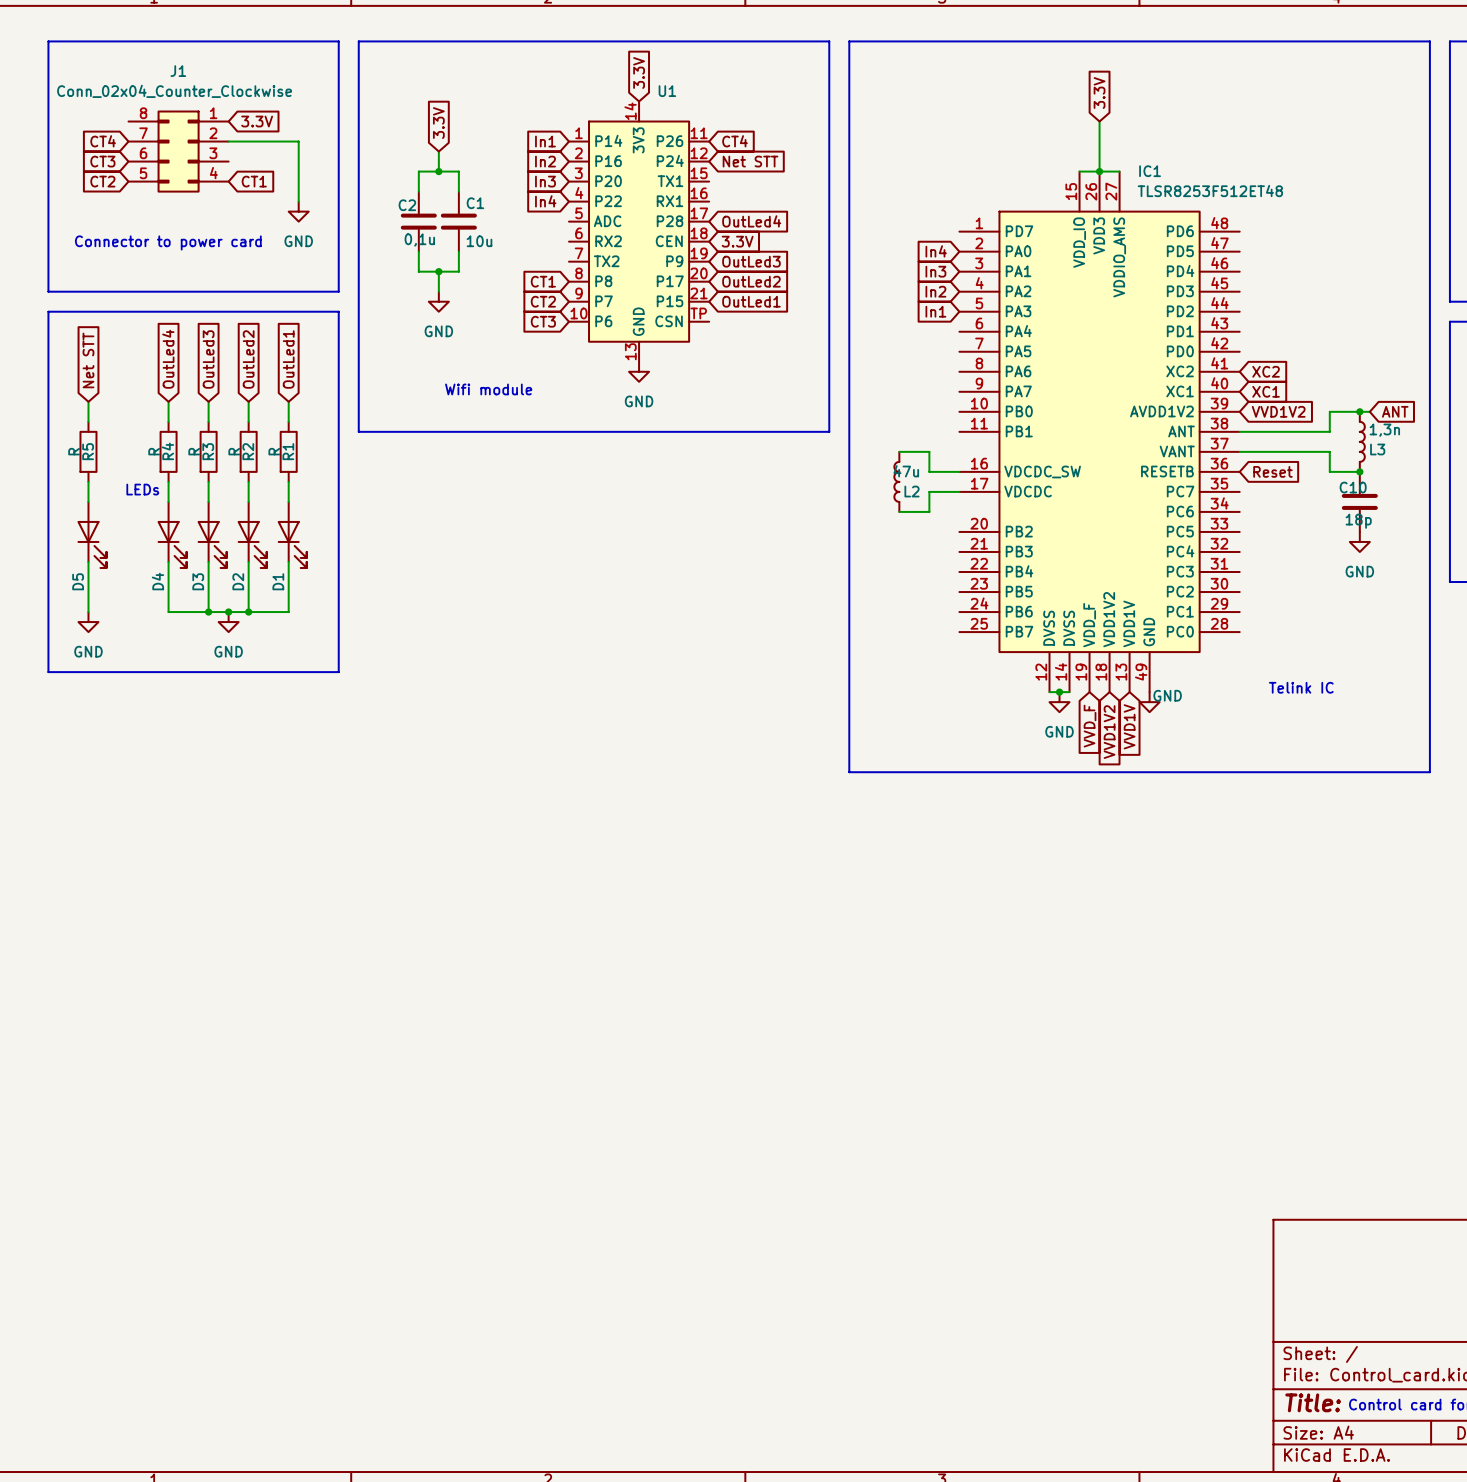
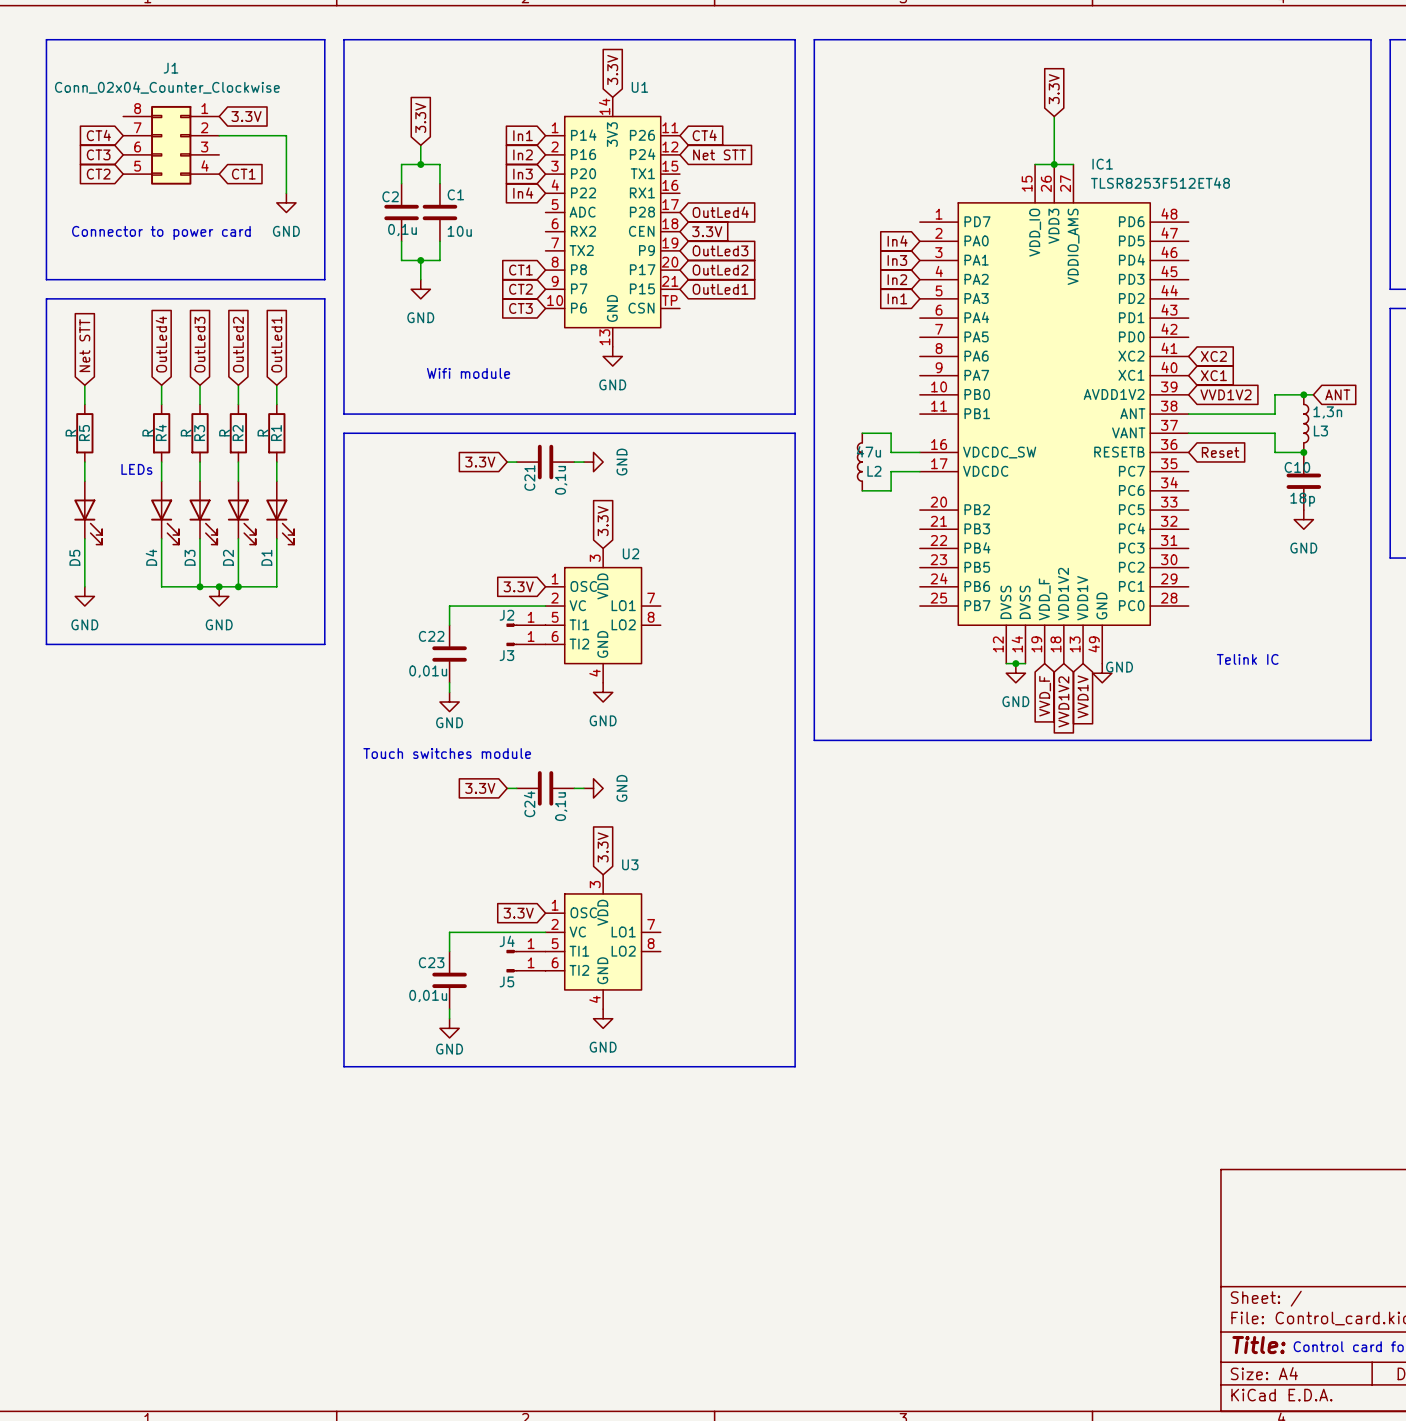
line: none -> (343, 433) (795, 433) (795, 1066) (343, 1066) (343, 433)
global label: none -> 3.3V (480, 462)
wire: none -> (507, 462) (516, 462)
C21: none -> 0,1u (545, 462)
wire: none -> (574, 462) (583, 462)
power symbol: none -> GND (593, 462)
global label: none -> 3.3V (603, 521)
global label: none -> 3.3V (518, 586)
wire: none -> (545, 606) (449, 606) (449, 625)
U2: none -> (603, 615)
J2: none -> (526, 625)
J3: none -> (526, 644)
C22: none -> 0,01u (449, 654)
wire: none -> (449, 682) (449, 692)
power symbol: none -> GND (603, 692)
power symbol: none -> GND (449, 702)
text: none -> Touch switches module (447, 753)
global label: none -> 3.3V (480, 788)
wire: none -> (507, 788) (516, 788)
C24: none -> 0,1u (545, 788)
wire: none -> (574, 788) (583, 788)
power symbol: none -> GND (593, 788)
global label: none -> 3.3V (603, 847)
global label: none -> 3.3V (518, 913)
wire: none -> (545, 932) (449, 932) (449, 951)
U3: none -> (603, 941)
J4: none -> (526, 951)
J5: none -> (526, 970)
C23: none -> 0,01u (449, 980)
wire: none -> (449, 1009) (449, 1018)
power symbol: none -> GND (603, 1018)
power symbol: none -> GND (449, 1028)

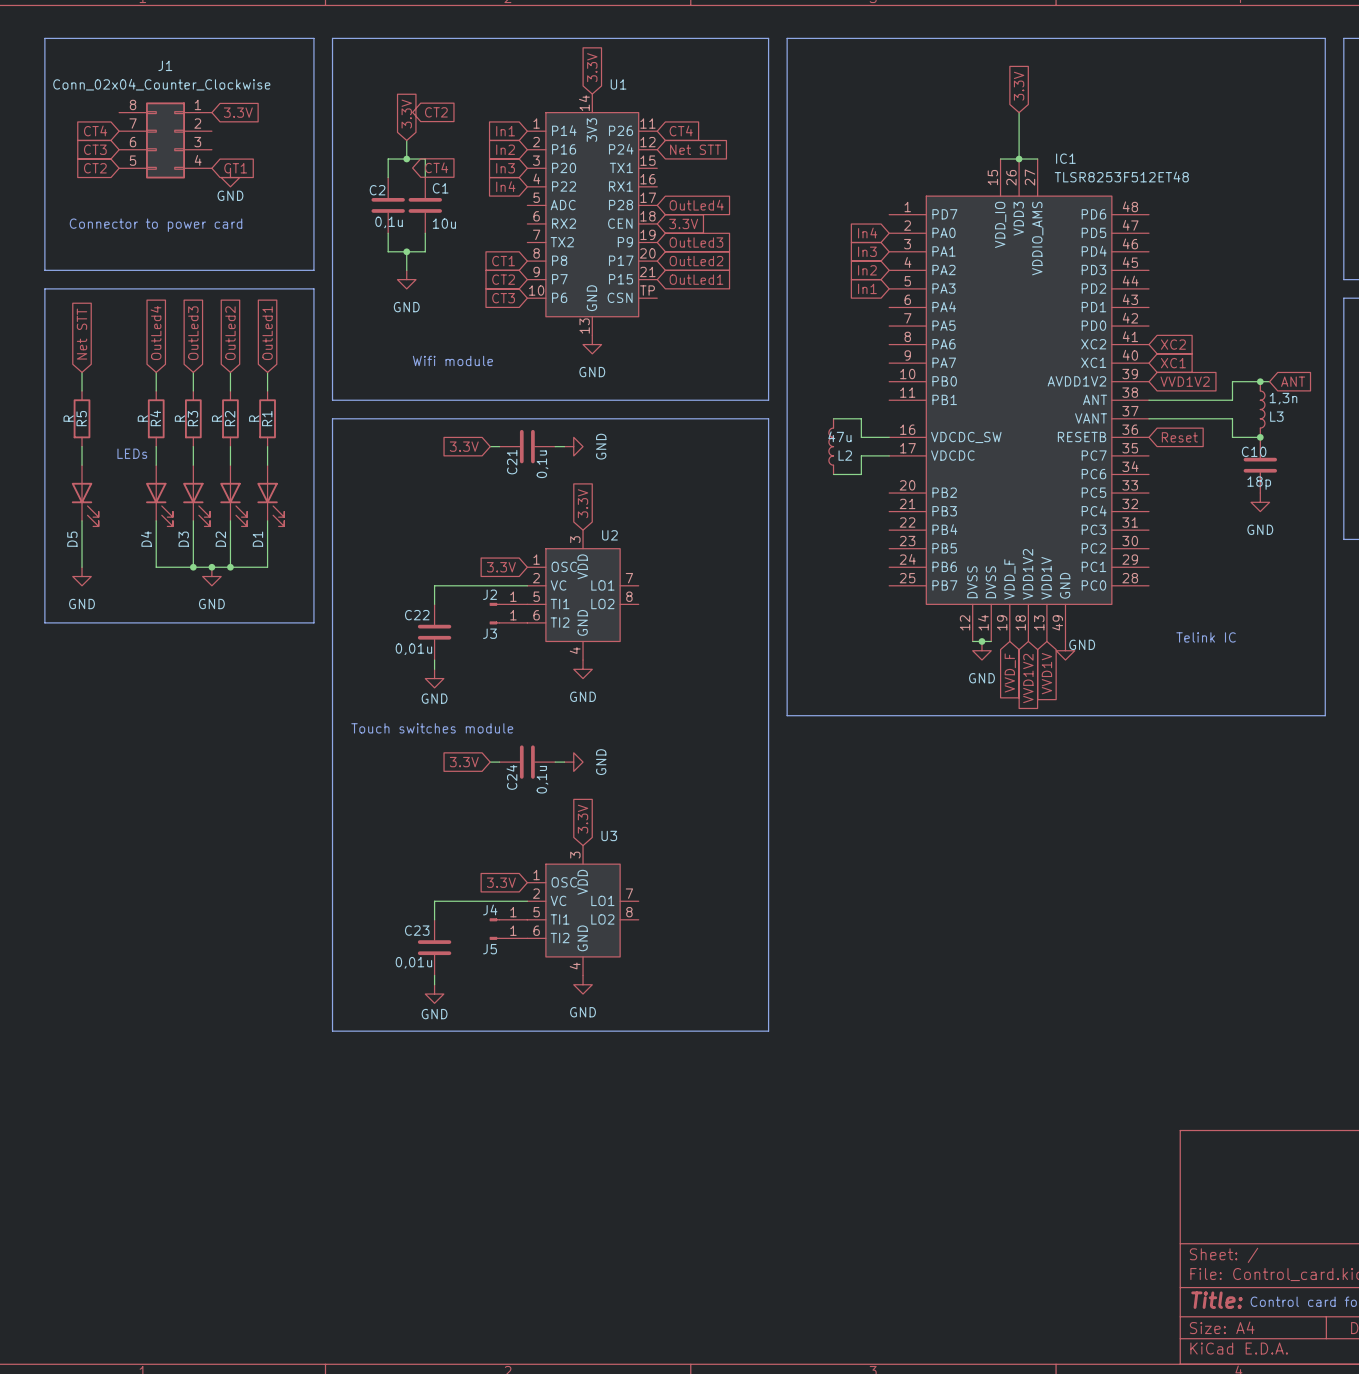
global label: none -> CT2 (436, 112)
wire: (219, 135) (286, 135) (286, 193) -> none
global label: none -> CT4 (436, 167)
power symbol position: GND (286, 202) -> GND (230, 177)
power symbol text position: GND (286, 231) -> GND (230, 195)

